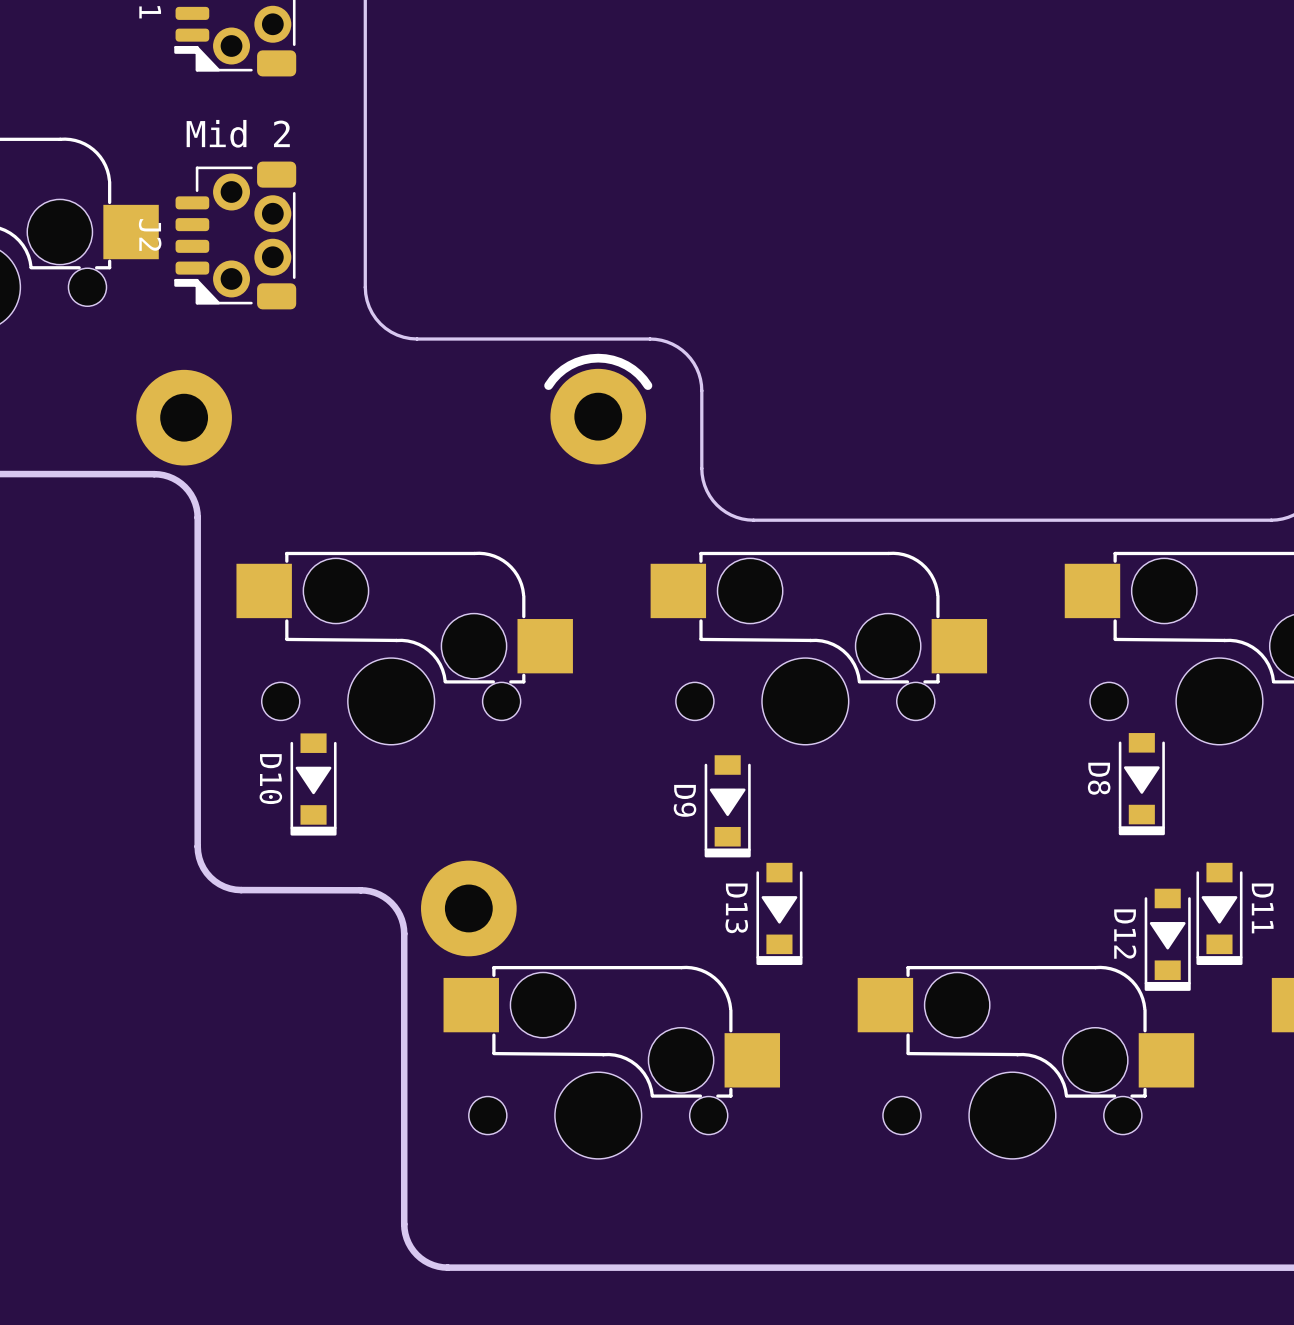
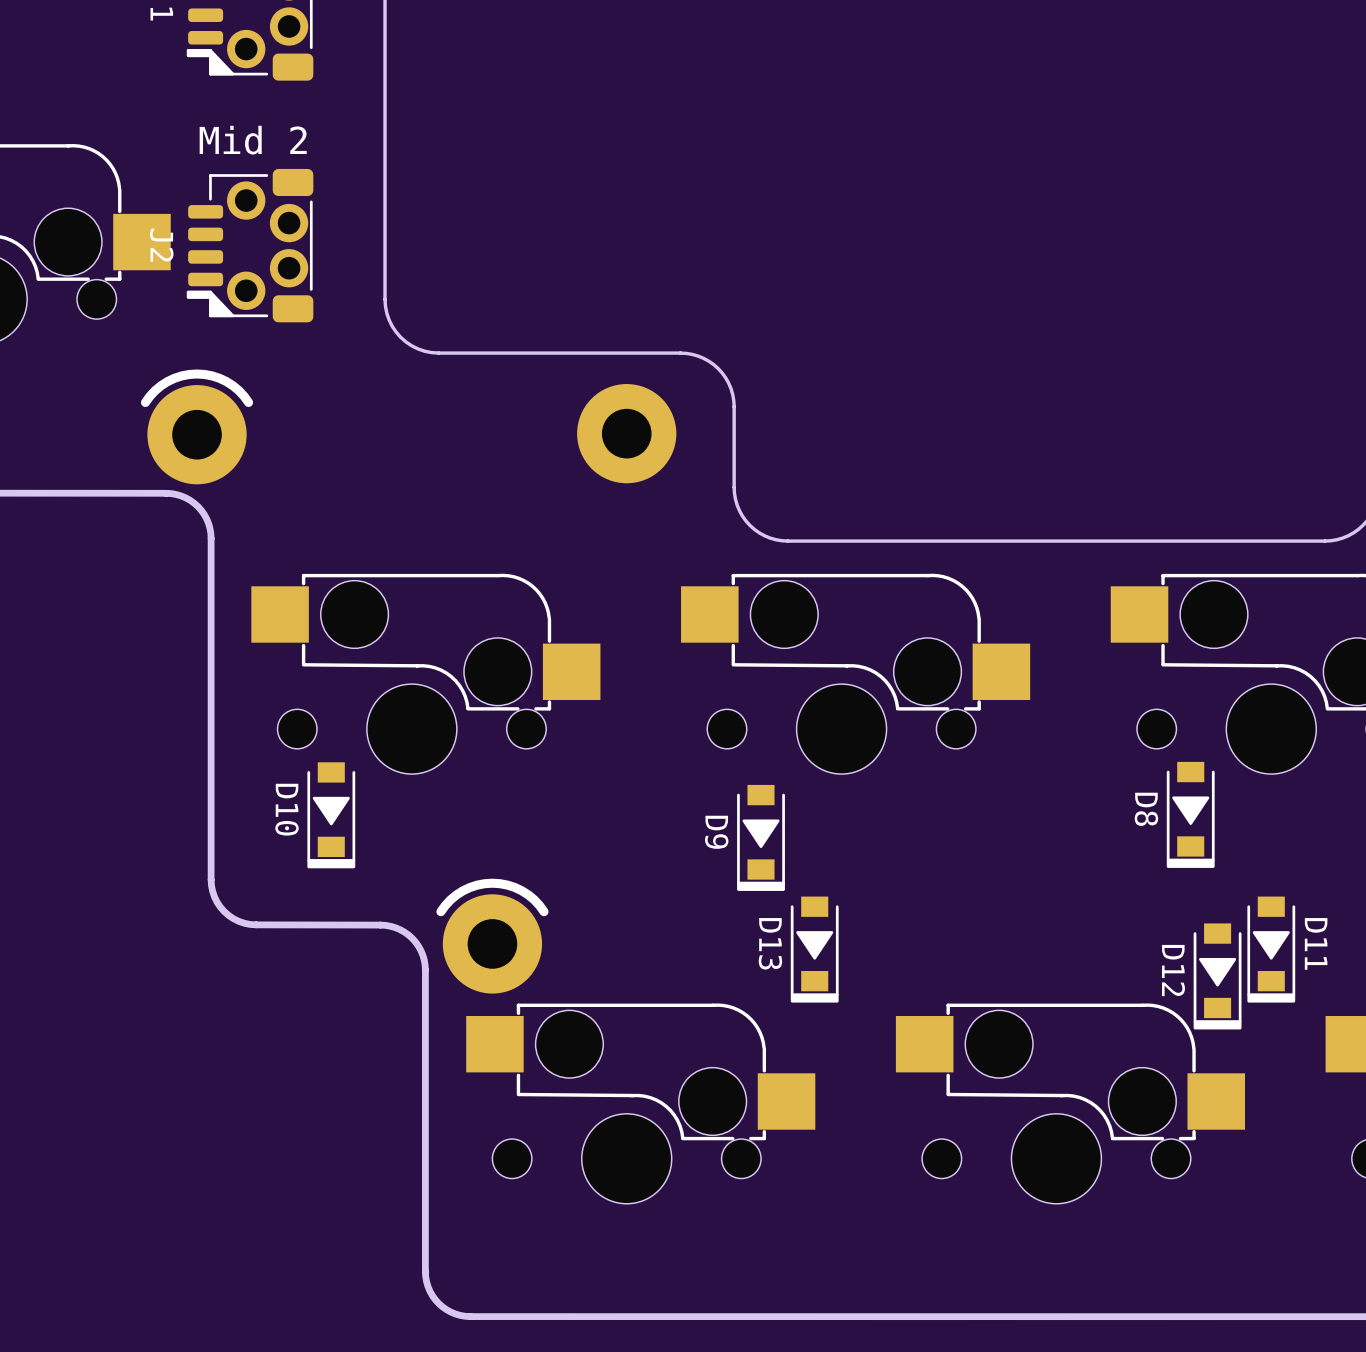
part side: bottom (598, 409) -> top (626, 433)
part side: top (184, 417) -> bottom (197, 426)
part side: top (468, 908) -> bottom (492, 936)

